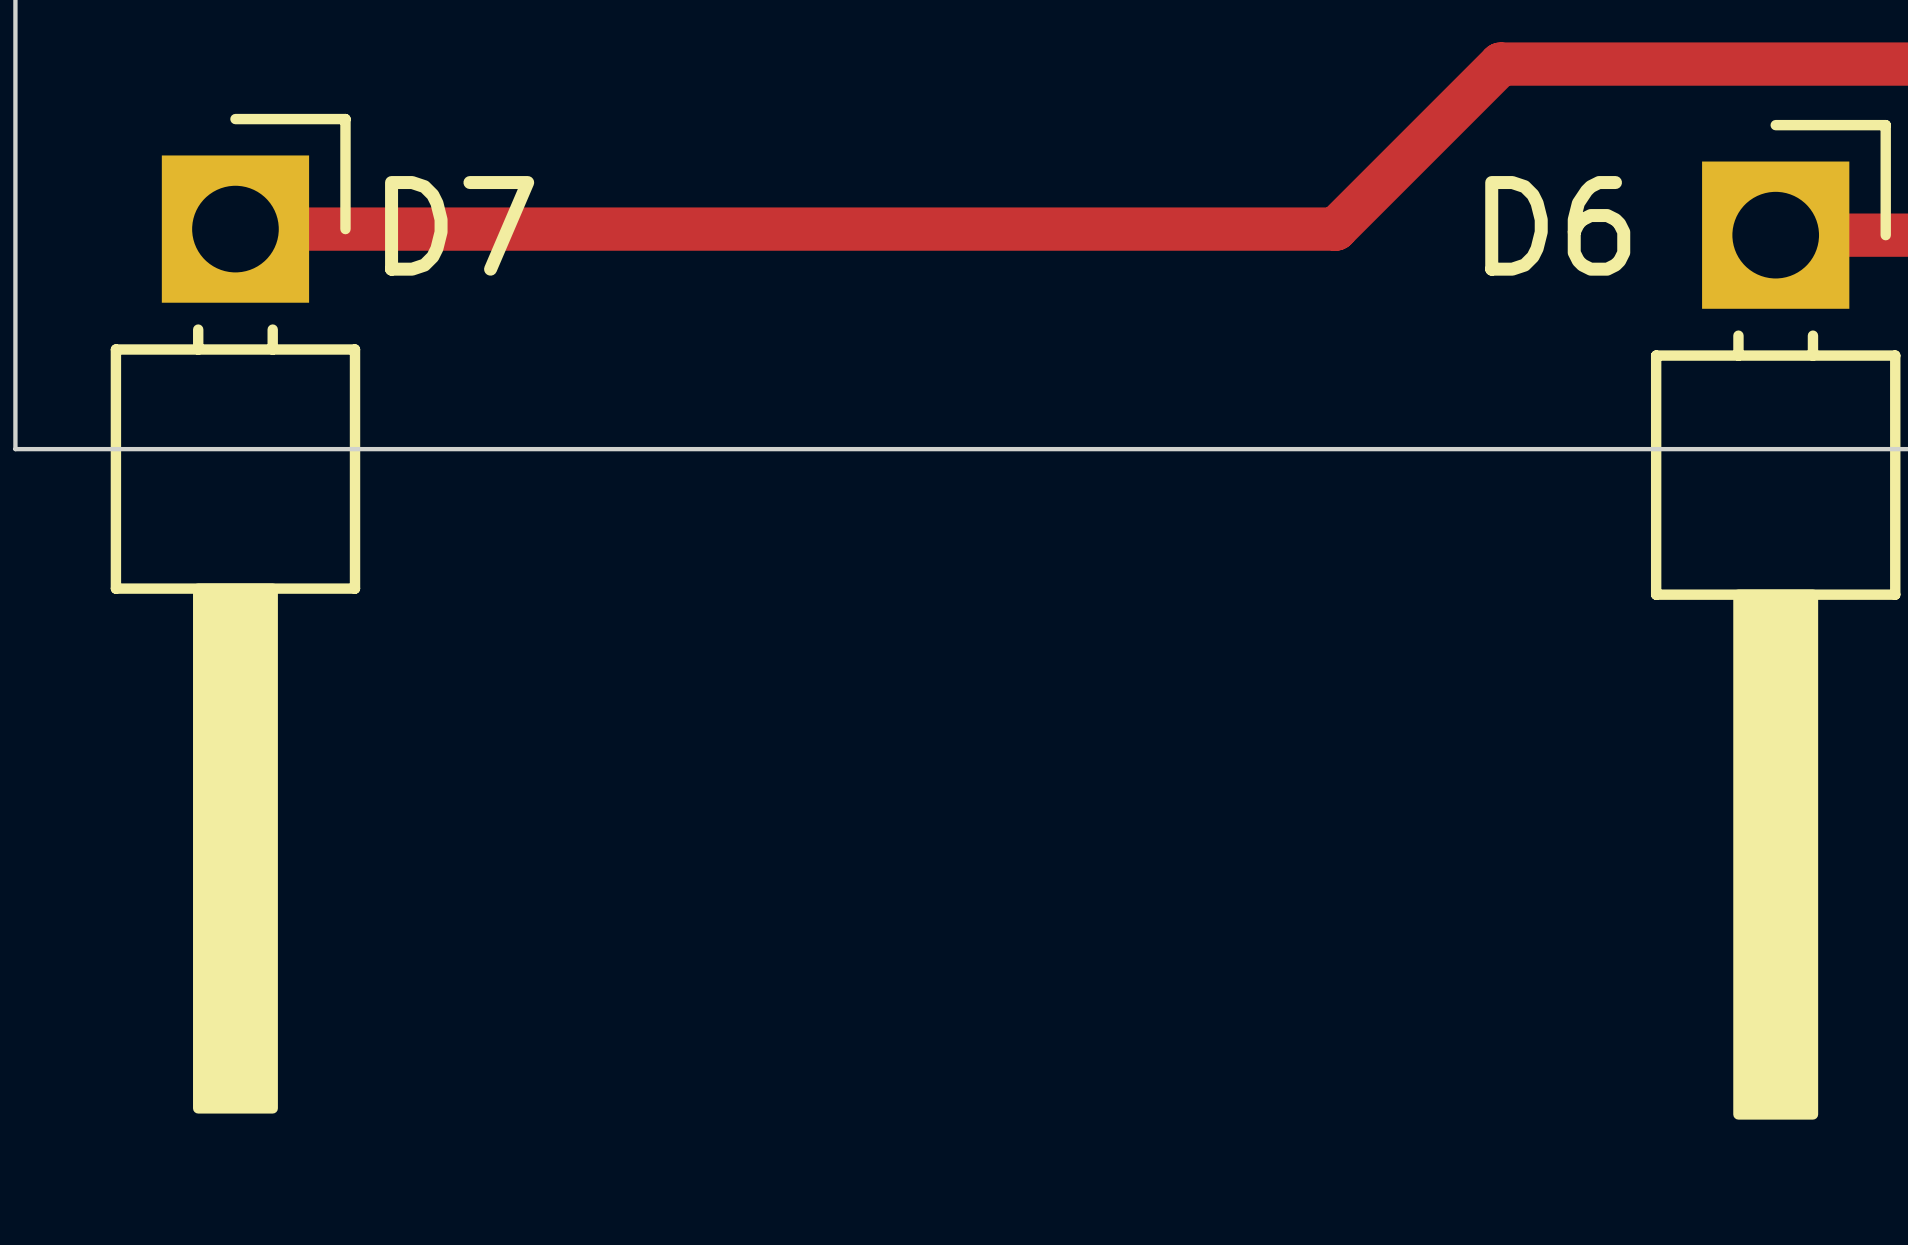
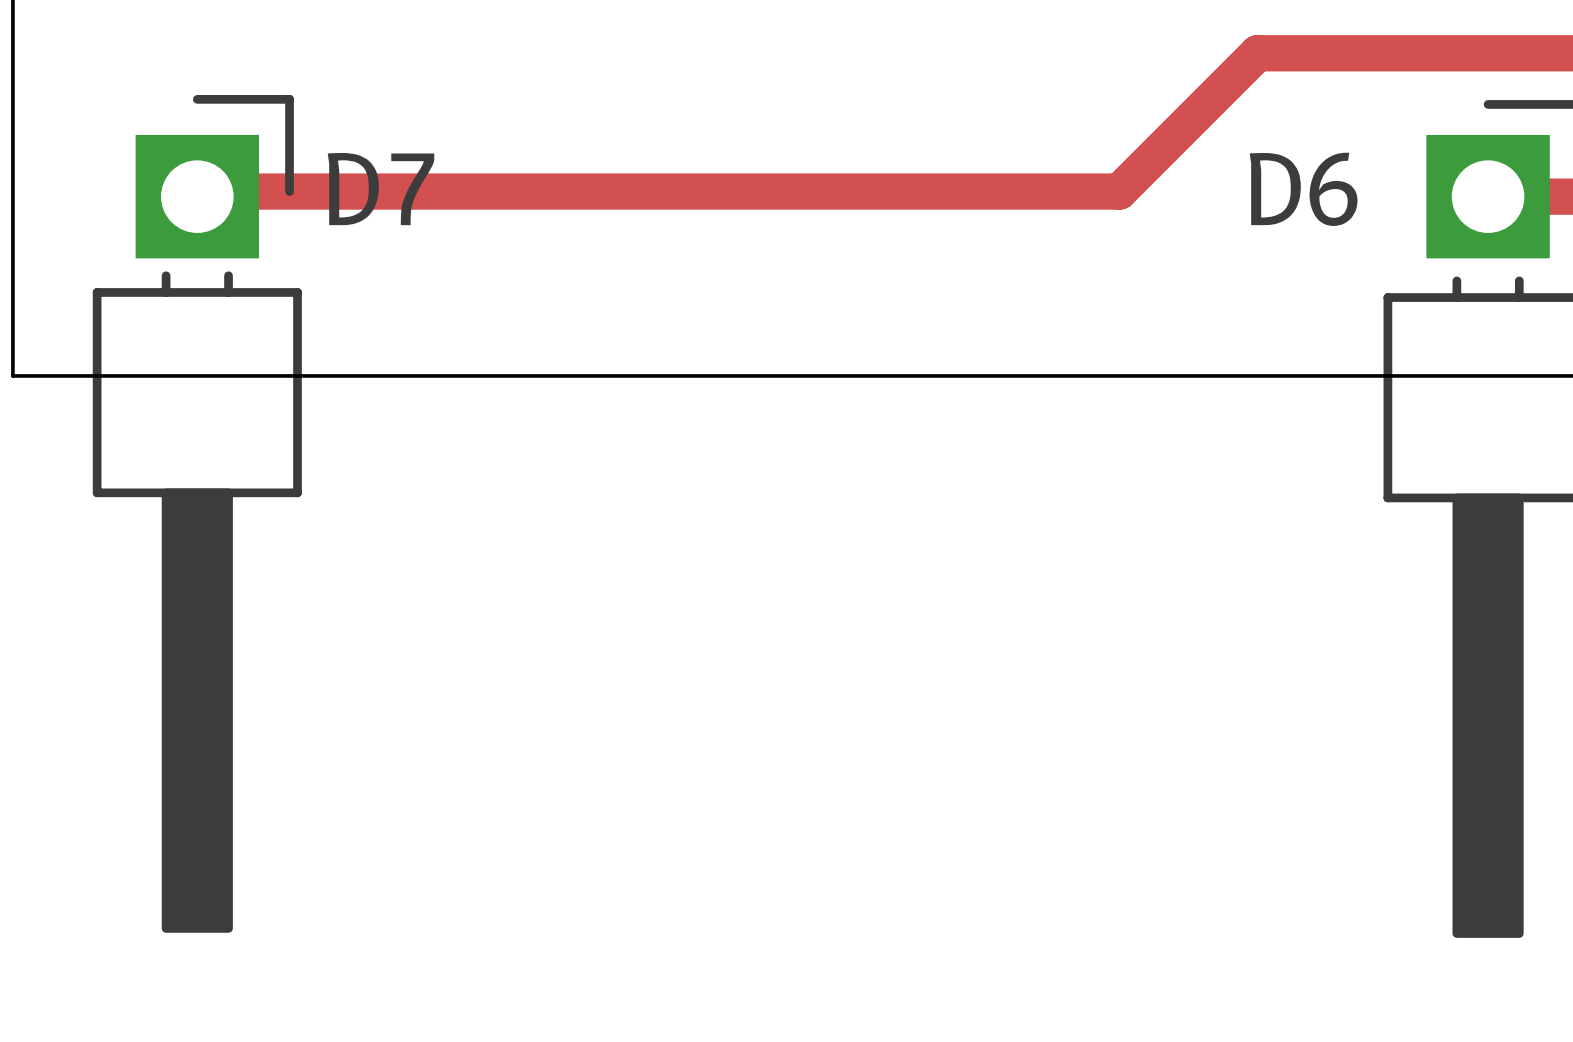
part footprint: [110, 113, 361, 1114] -> [92, 95, 302, 933]

